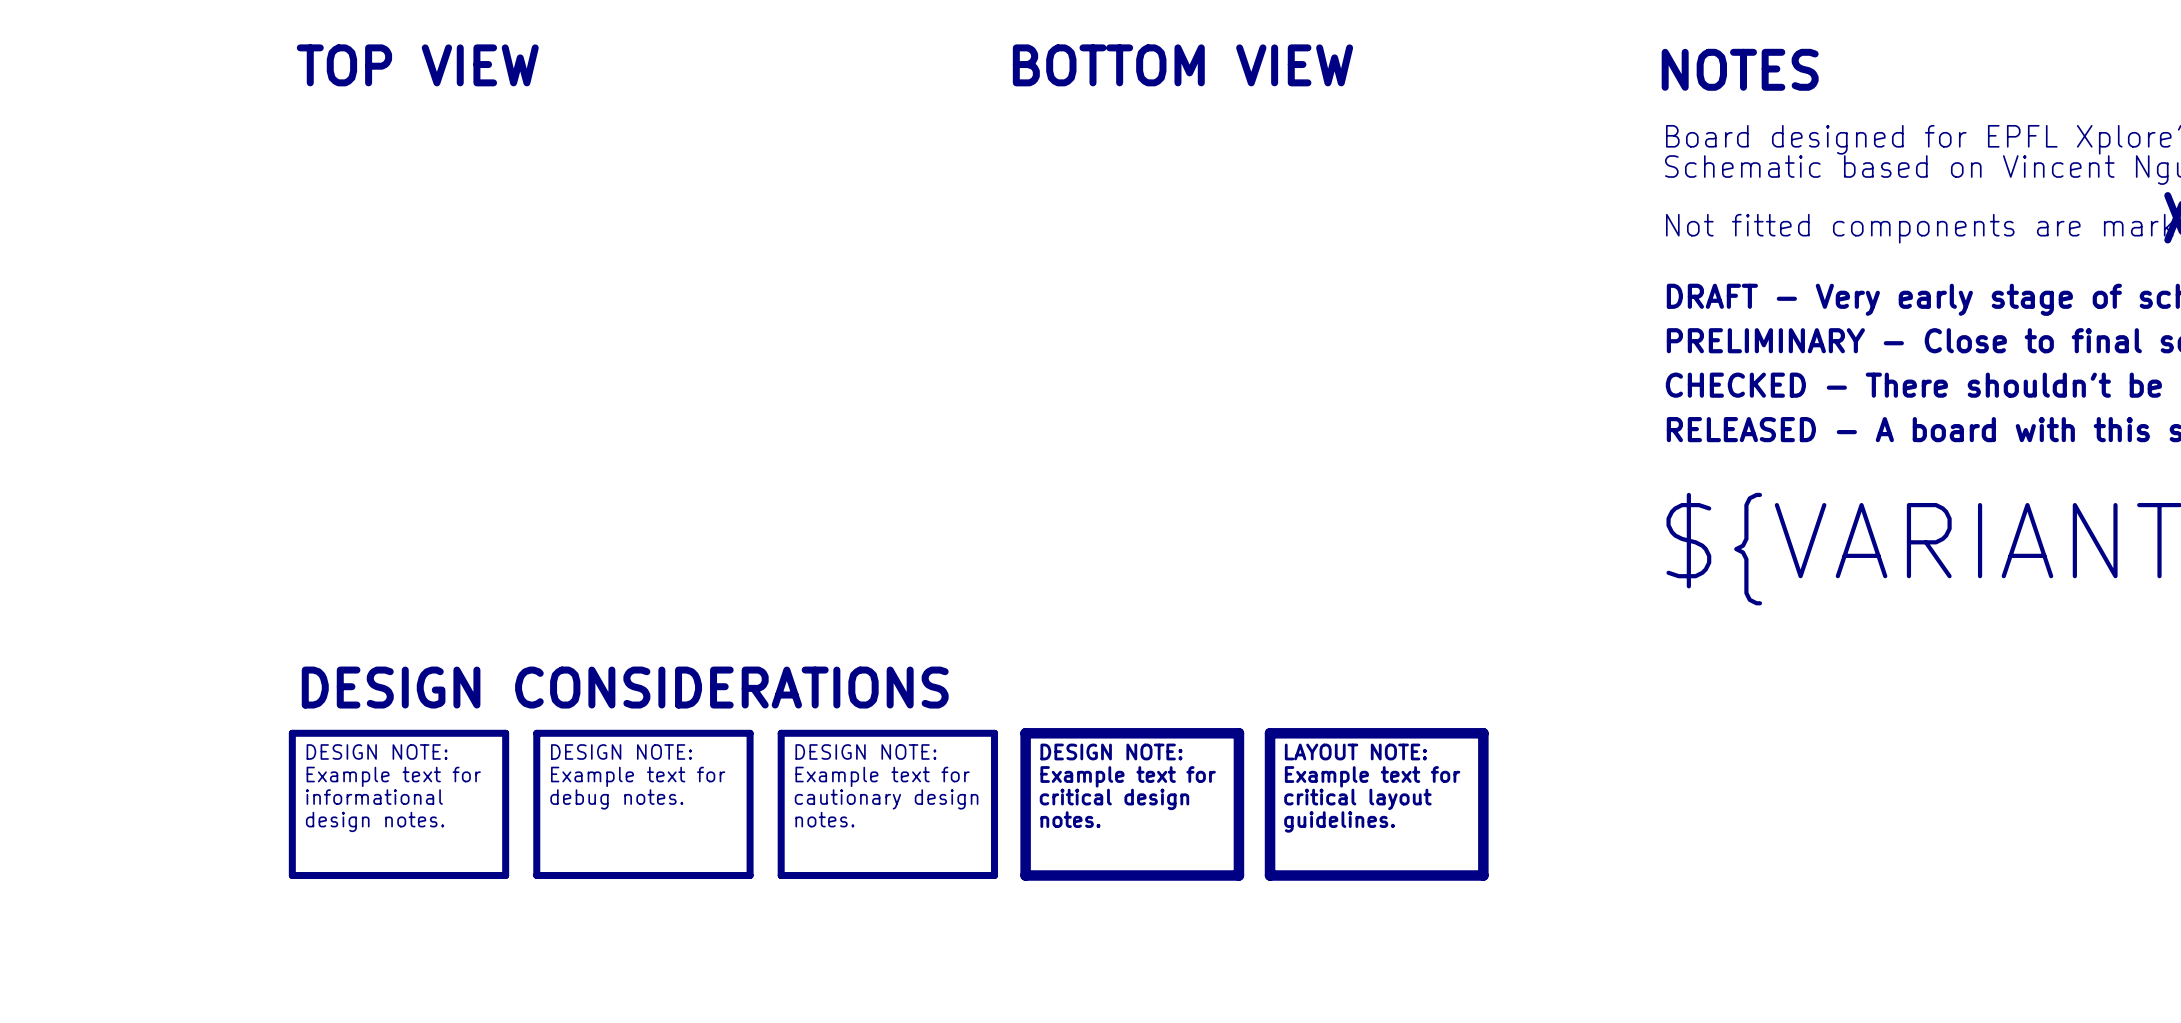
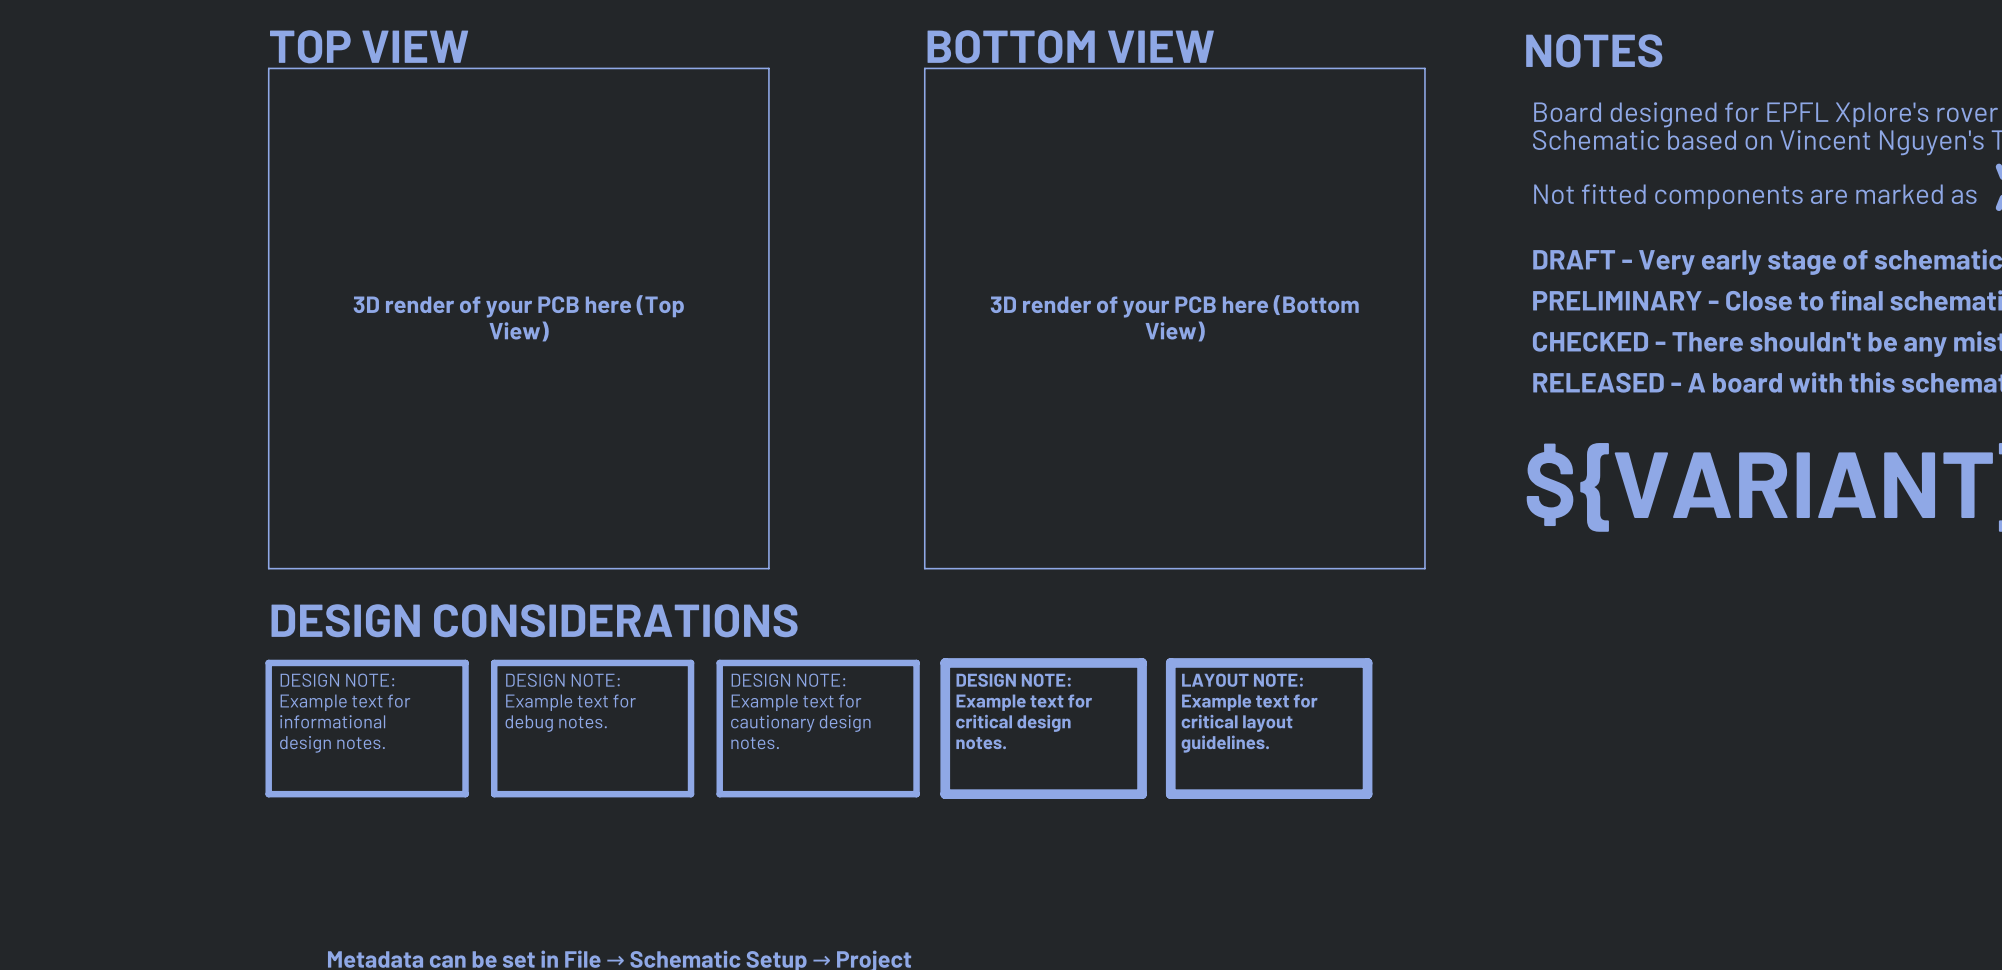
line: none -> (268, 68) (768, 68) (768, 568) (268, 568) (268, 68)
line: none -> (924, 68) (1424, 68) (1424, 568) (924, 568) (924, 68)
text: none -> 3D render of your PCB here (Top (518, 306)
text: none -> 3D render of your PCB here (Bottom (1174, 306)
text: none -> View) (519, 331)
text: none -> View) (1175, 331)

